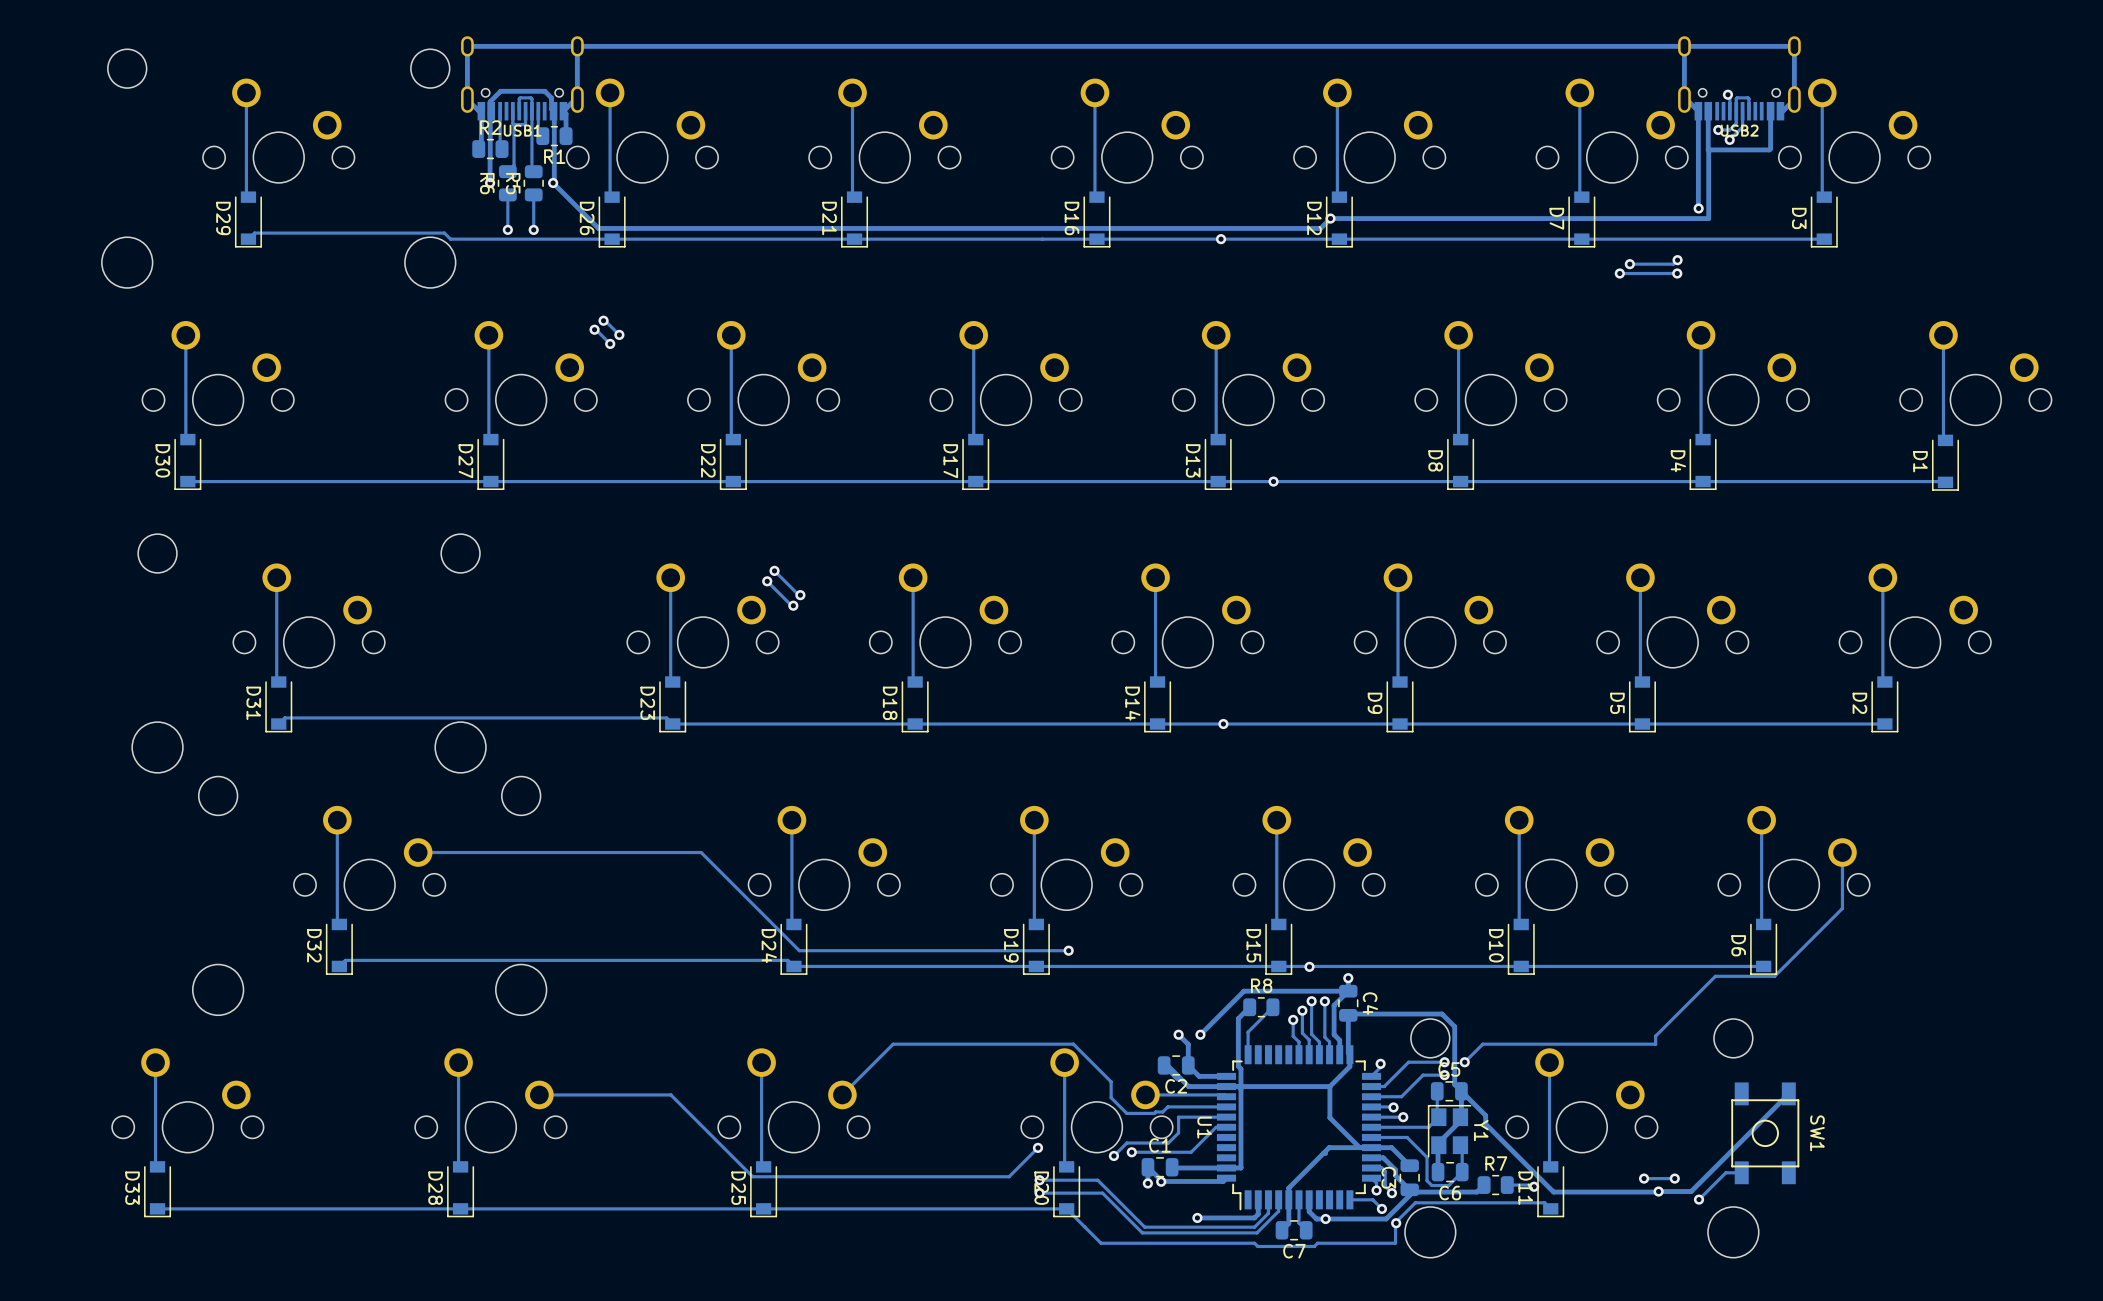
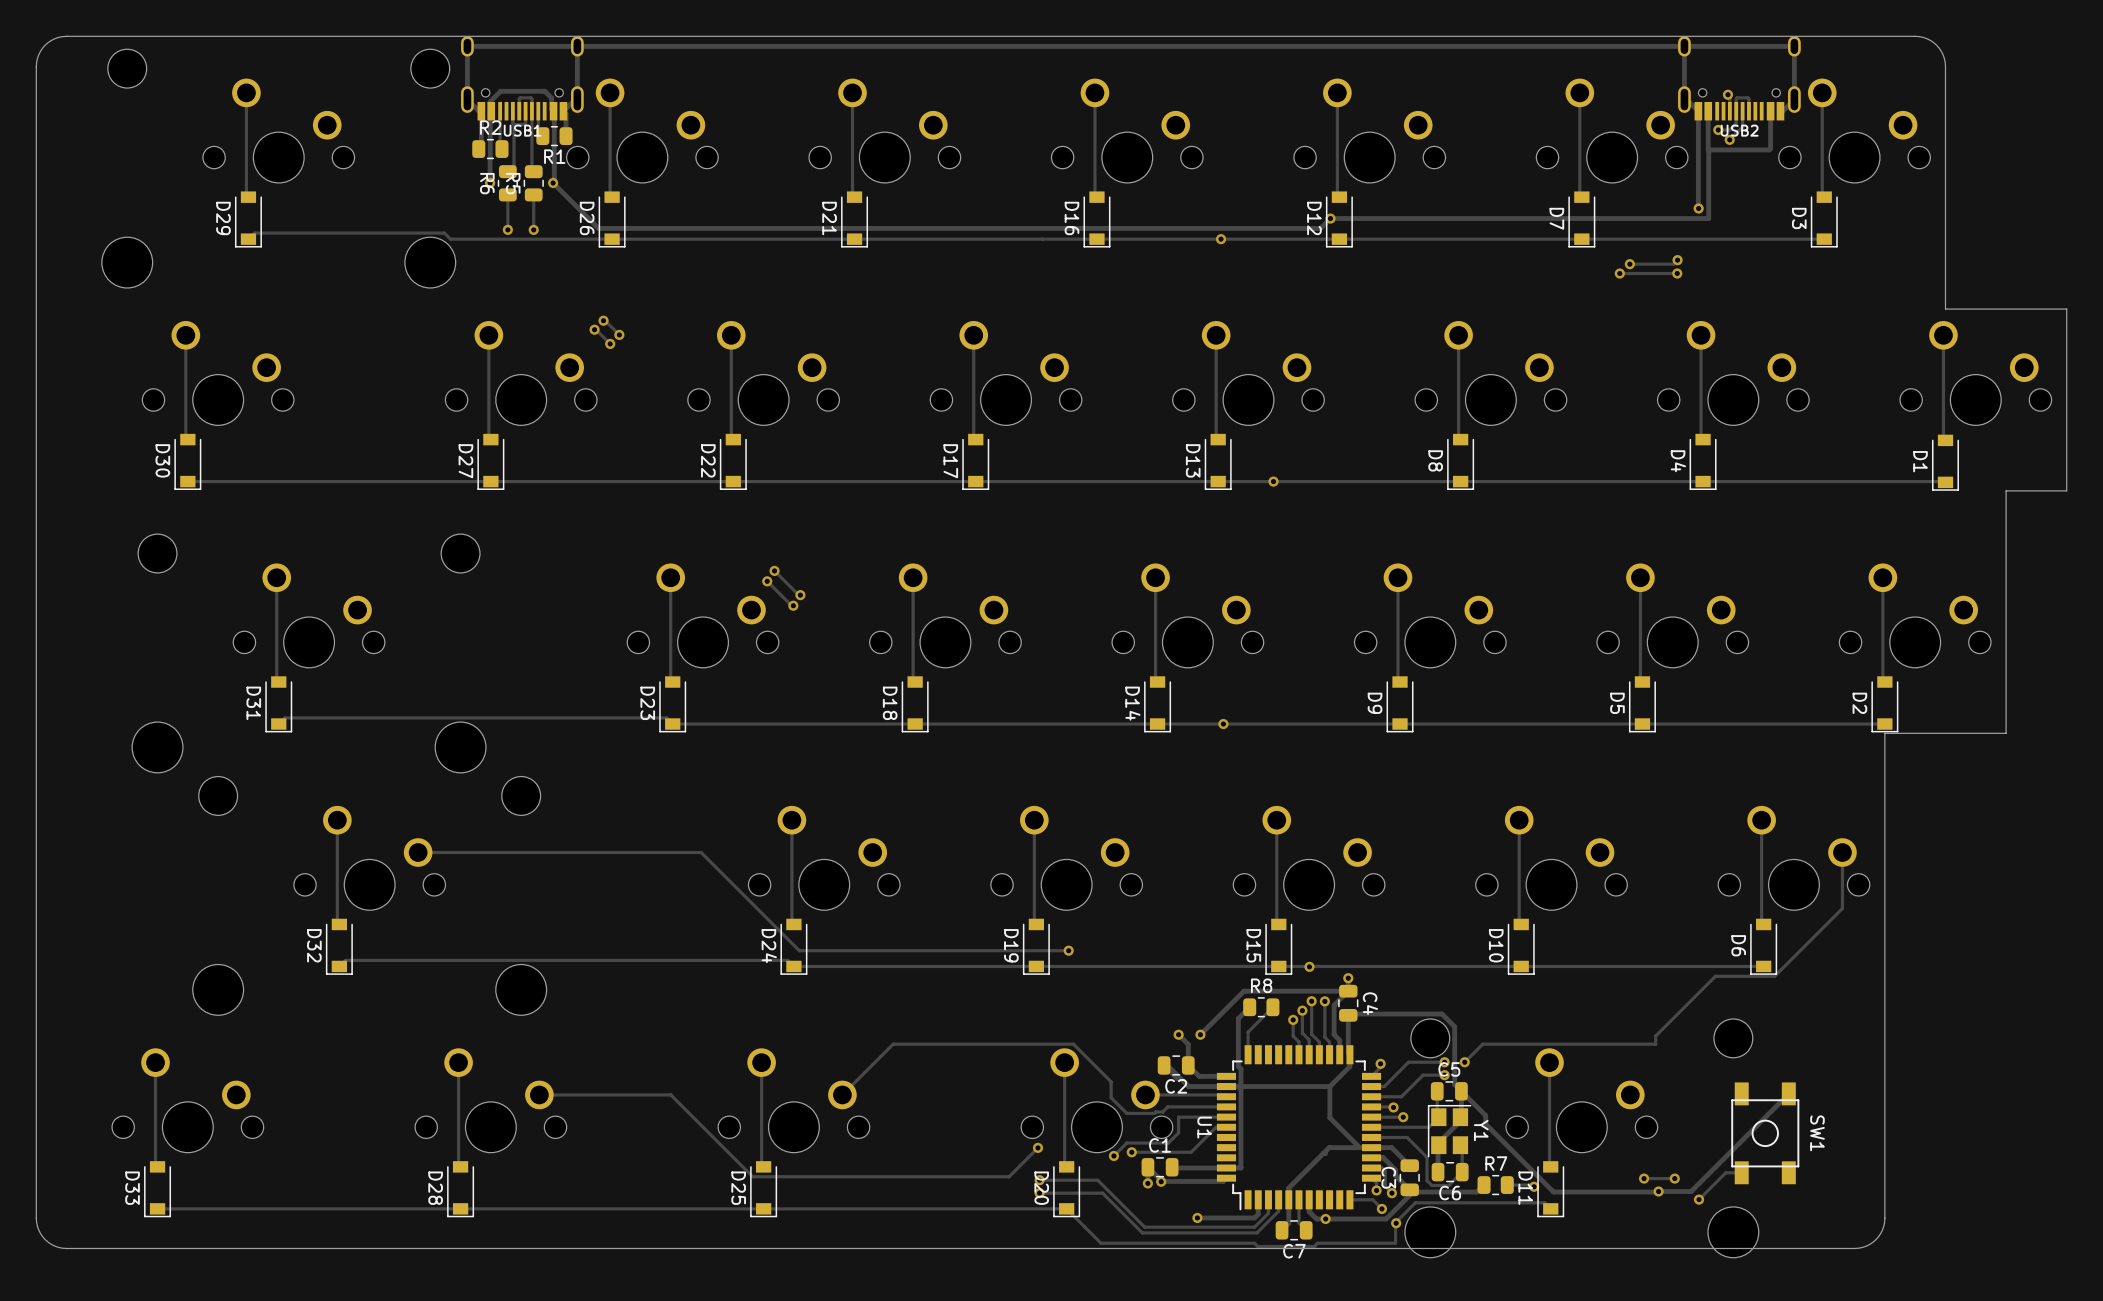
board edge: none -> (1915, 36) (66, 36) (51, 40) (40, 51) (36, 66) (36, 1218) (40, 1233) (51, 1244) (66, 1248) (1854, 1248) (1869, 1244) (1880, 1233) (1884, 1218) (1884, 733) (2006, 733) (2006, 490) (2066, 490) (2066, 309) (1945, 309) (1945, 62) (1941, 51) (1936, 45) (1926, 38) (1915, 36)

